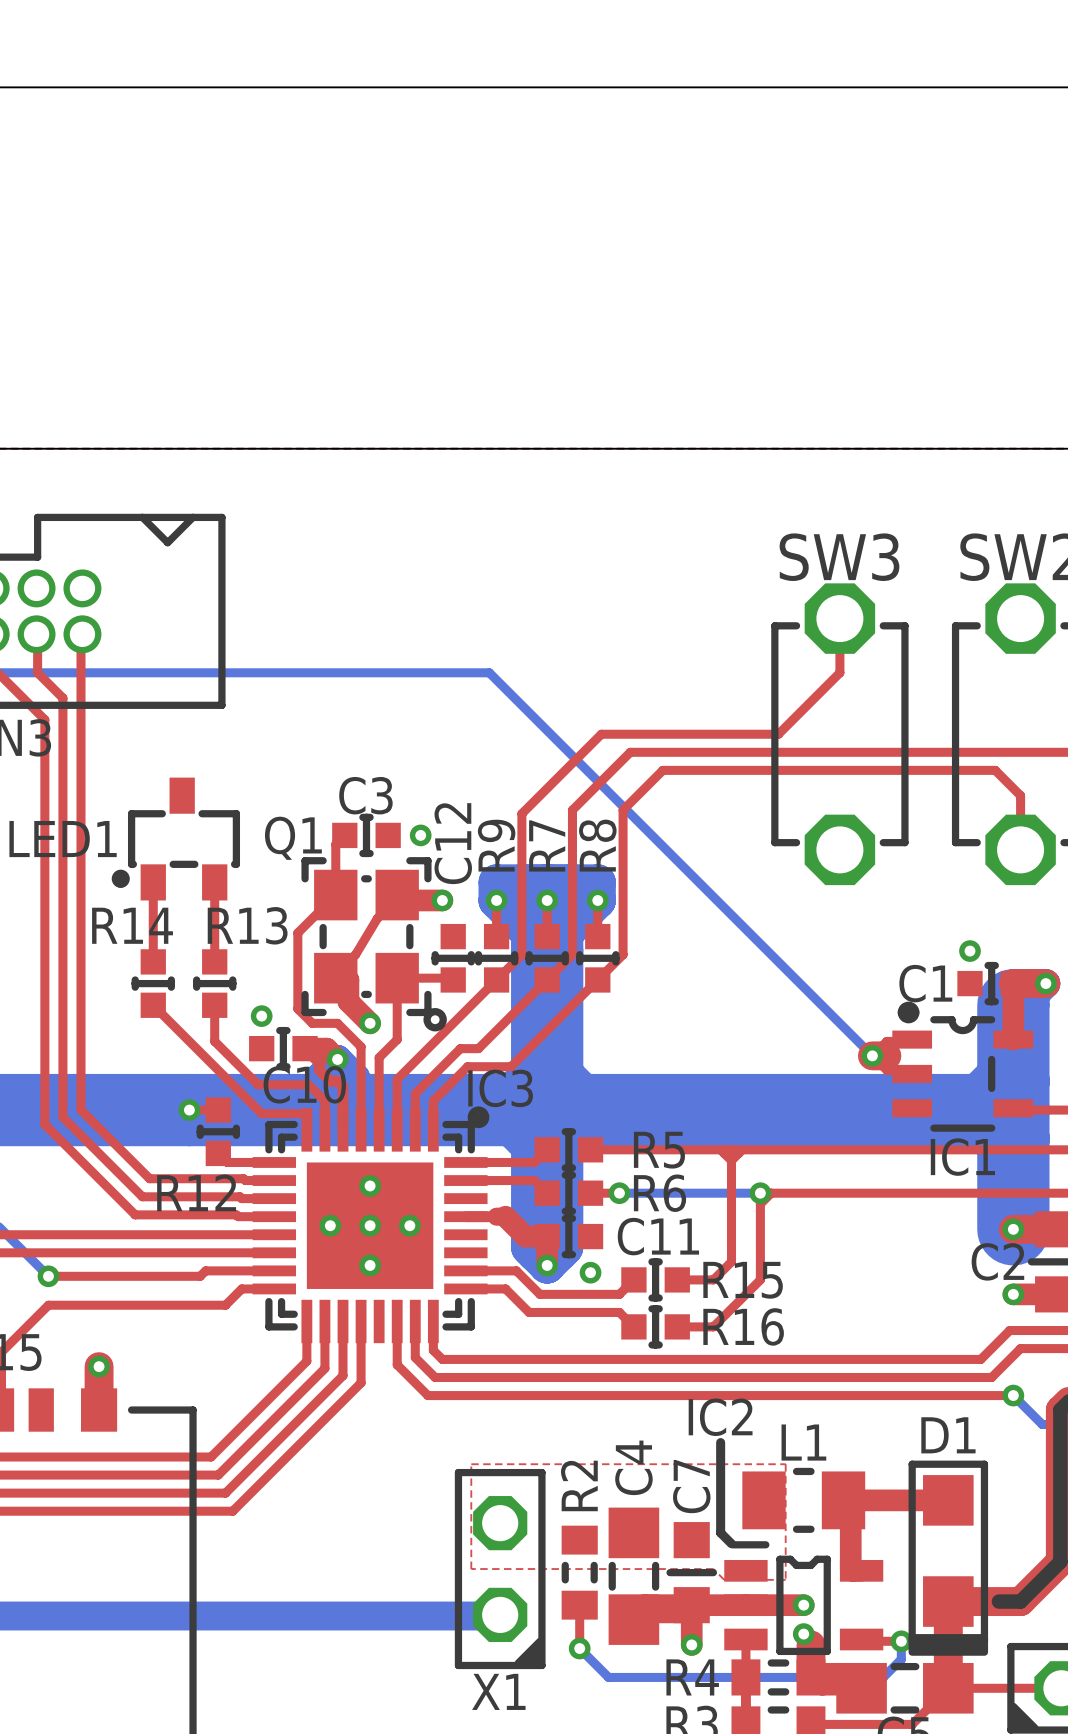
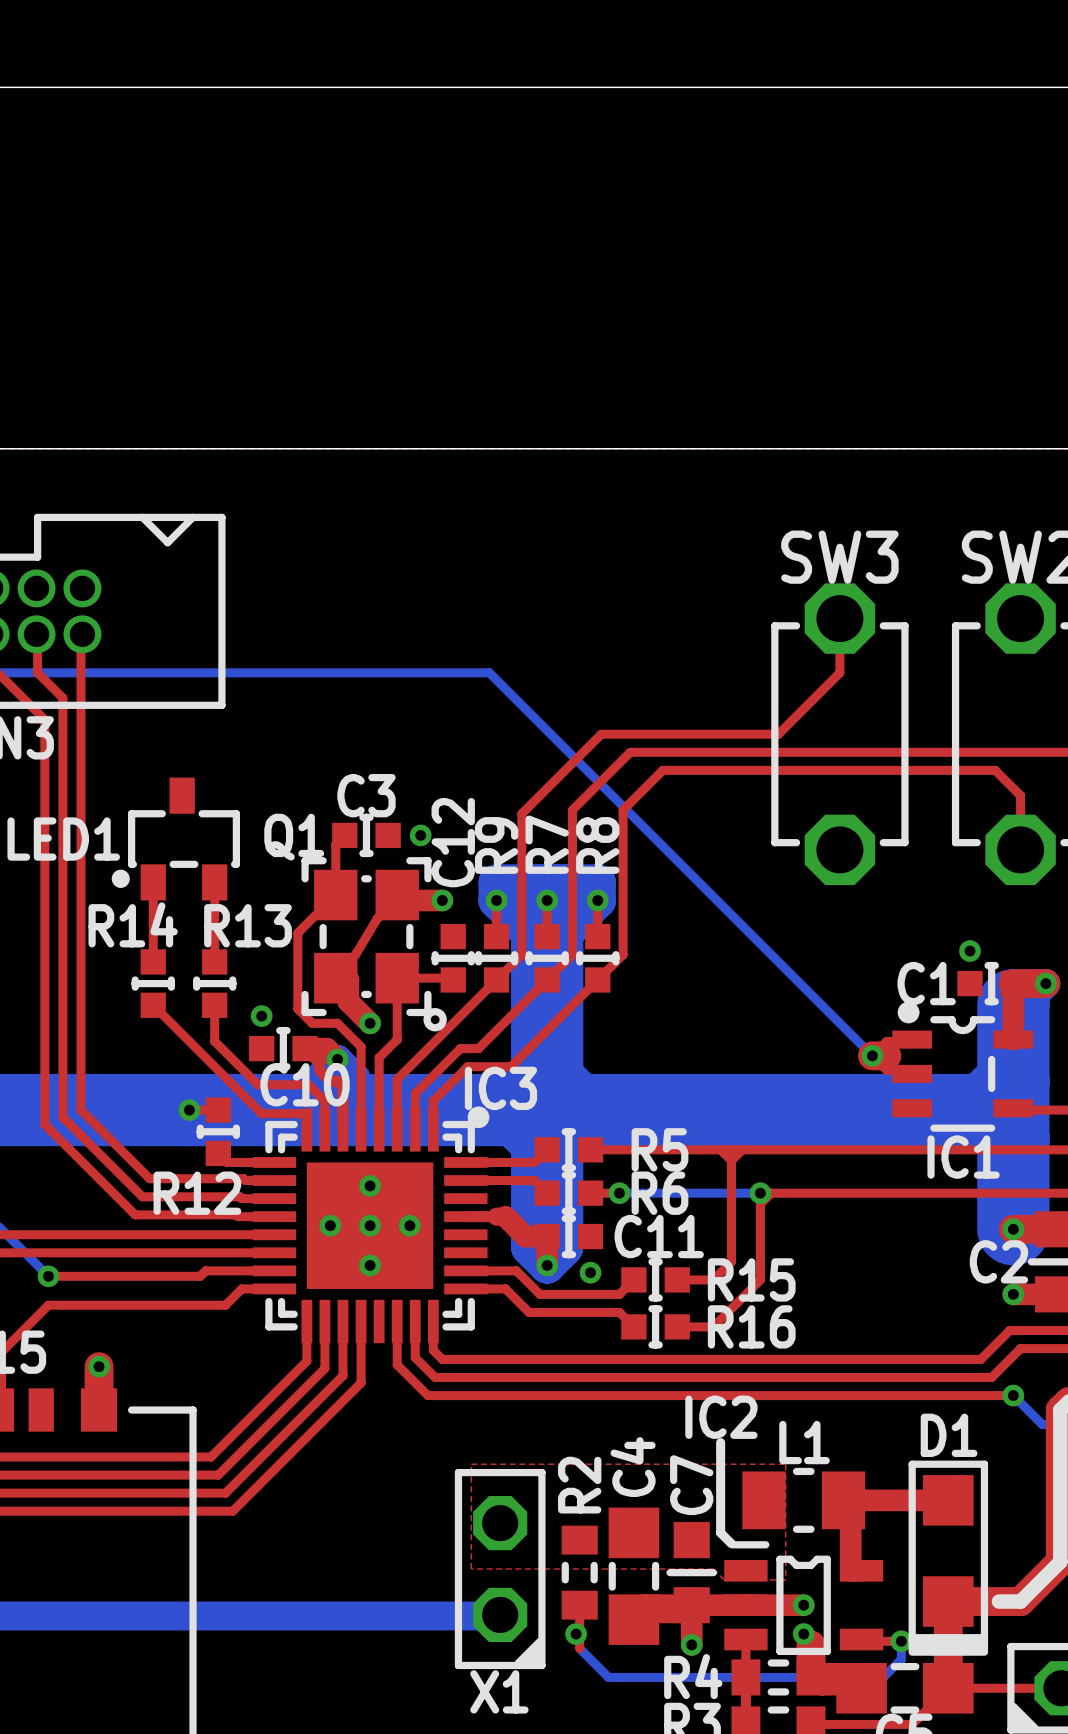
via position: (579, 1648) -> (576, 1634)

